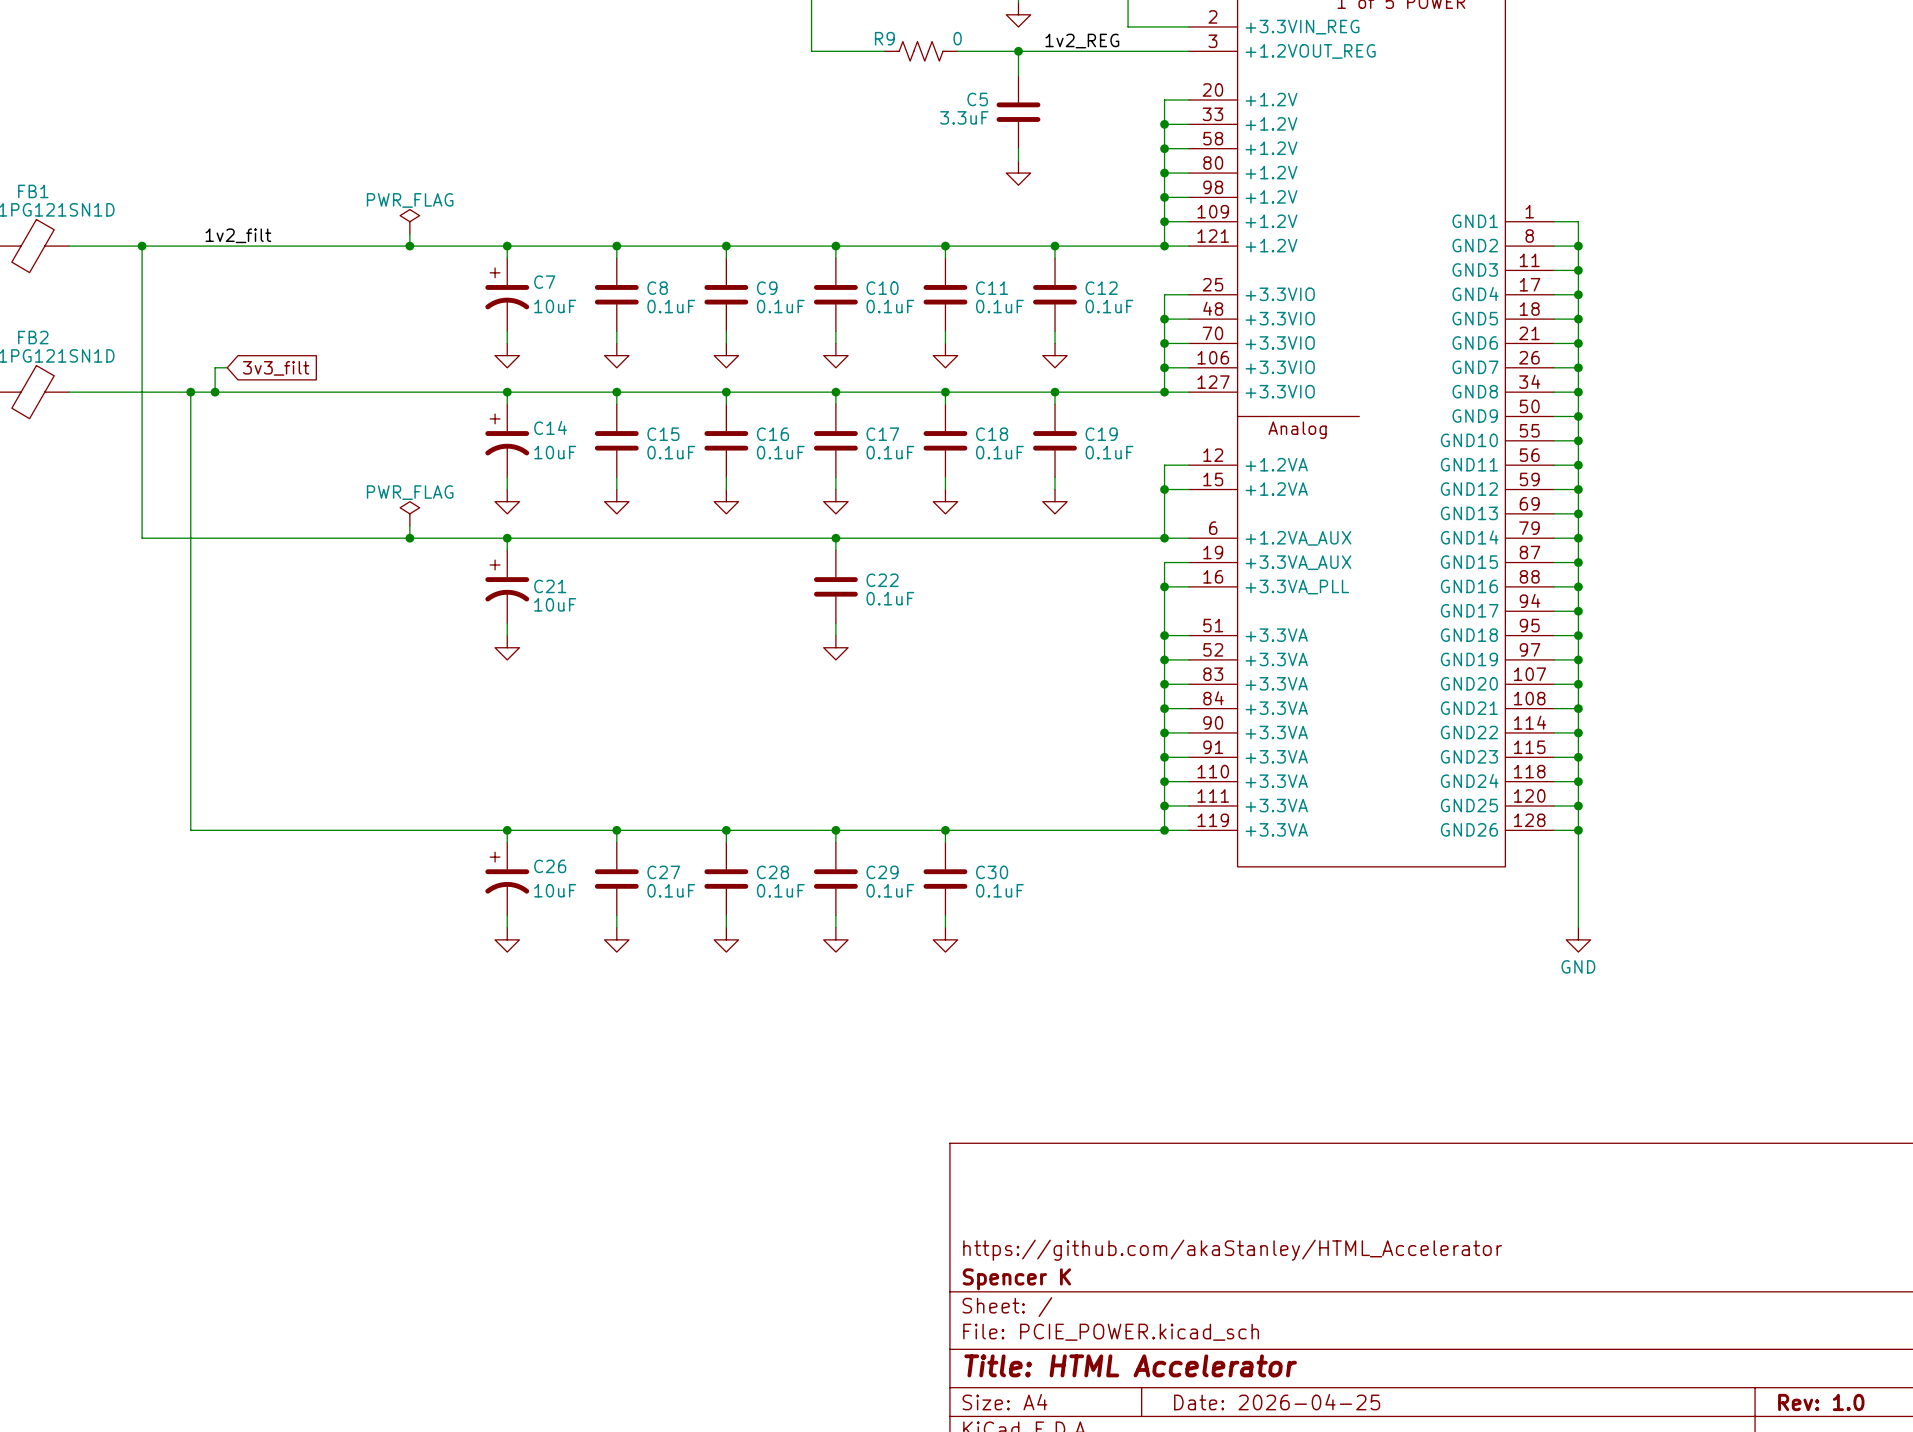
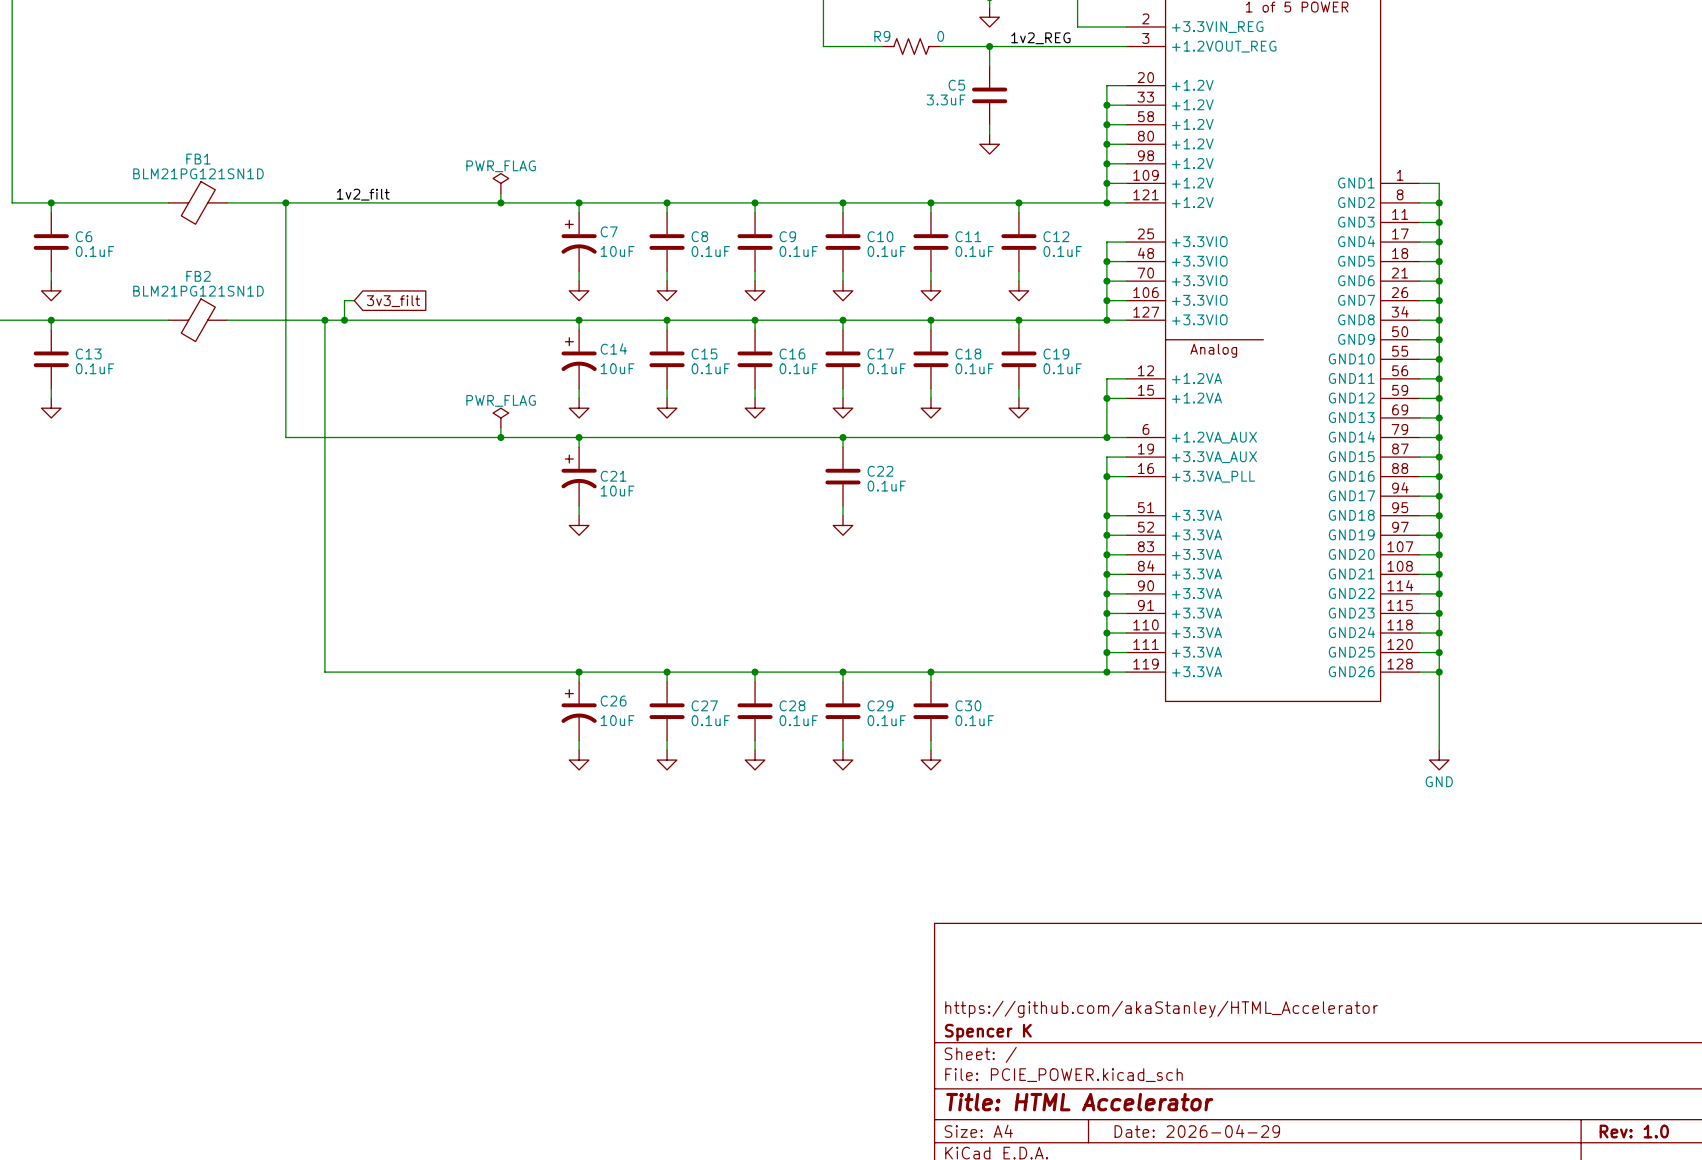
title block: Date: 2026-04-25 (1277, 1402) -> Date: 2026-04-29 (1197, 1131)

